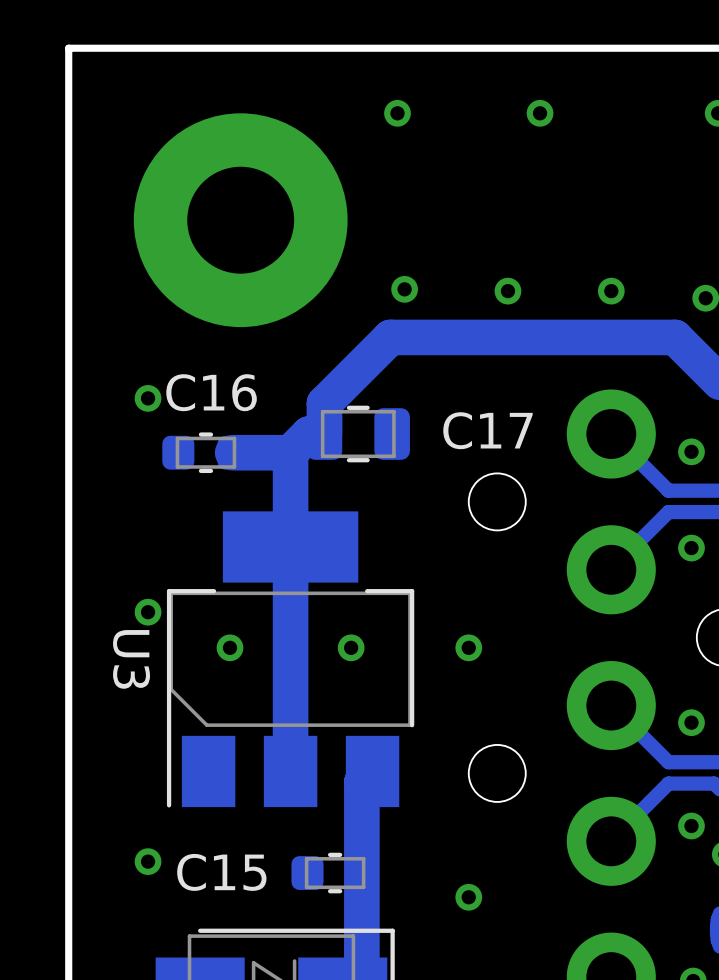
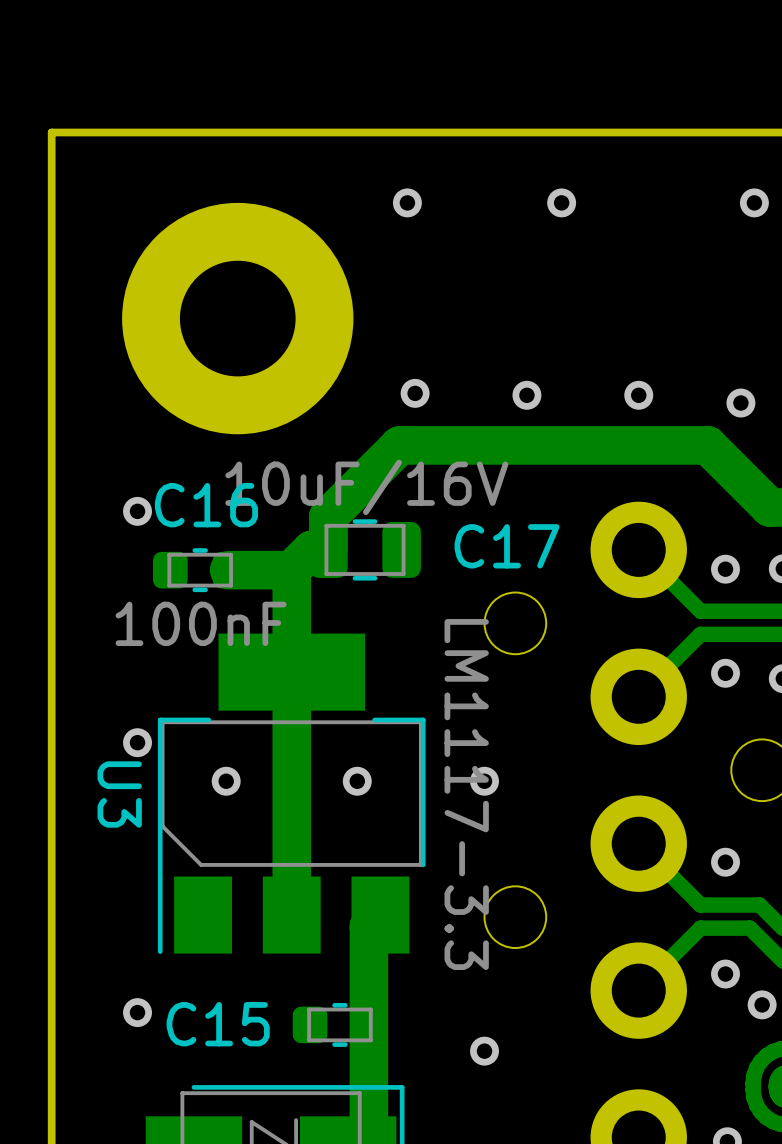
C17 value: none -> 10uF/16V (366, 487)
C16 value: none -> 100nF (201, 623)
U3 value: none -> LM1117-3.3 (466, 794)

